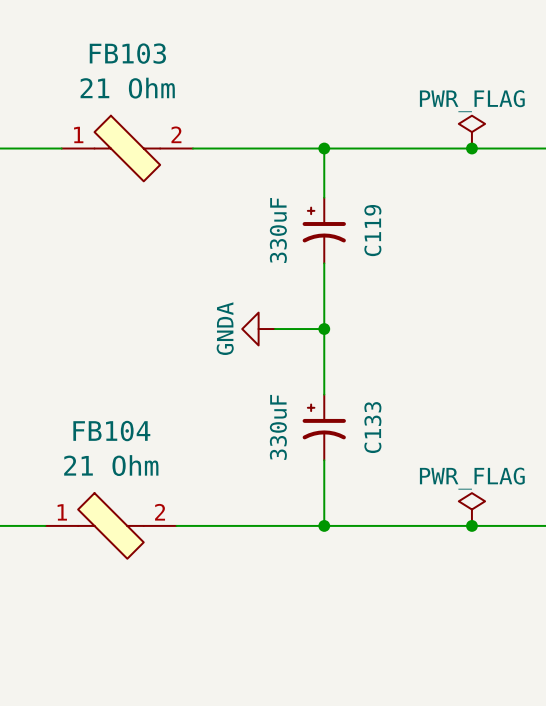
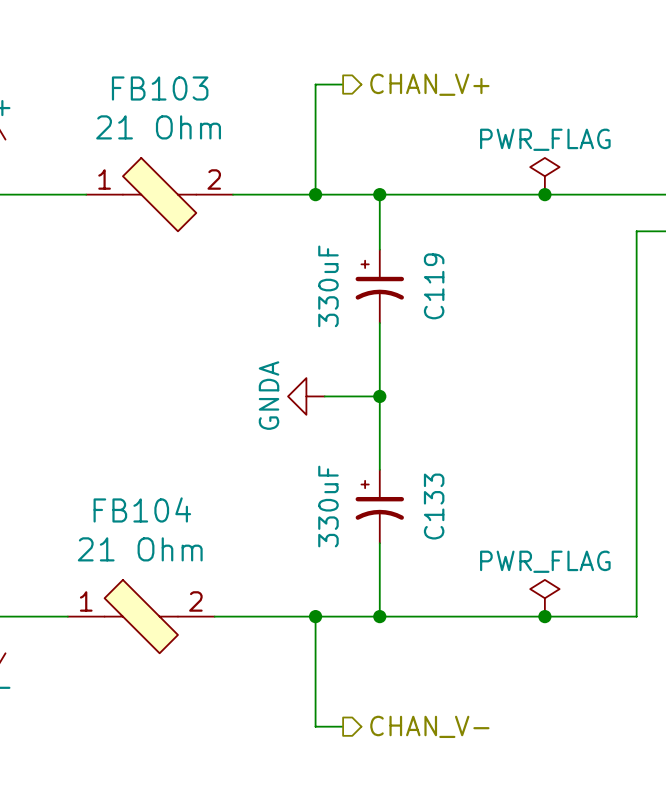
wire: none -> (343, 84) (315, 84) (315, 194)
hierarchical label: none -> CHAN_V+ (429, 84)
junction: none -> (315, 194)
wire: none -> (315, 616) (315, 726) (343, 726)
junction: none -> (315, 616)
hierarchical label: none -> CHAN_V- (429, 726)

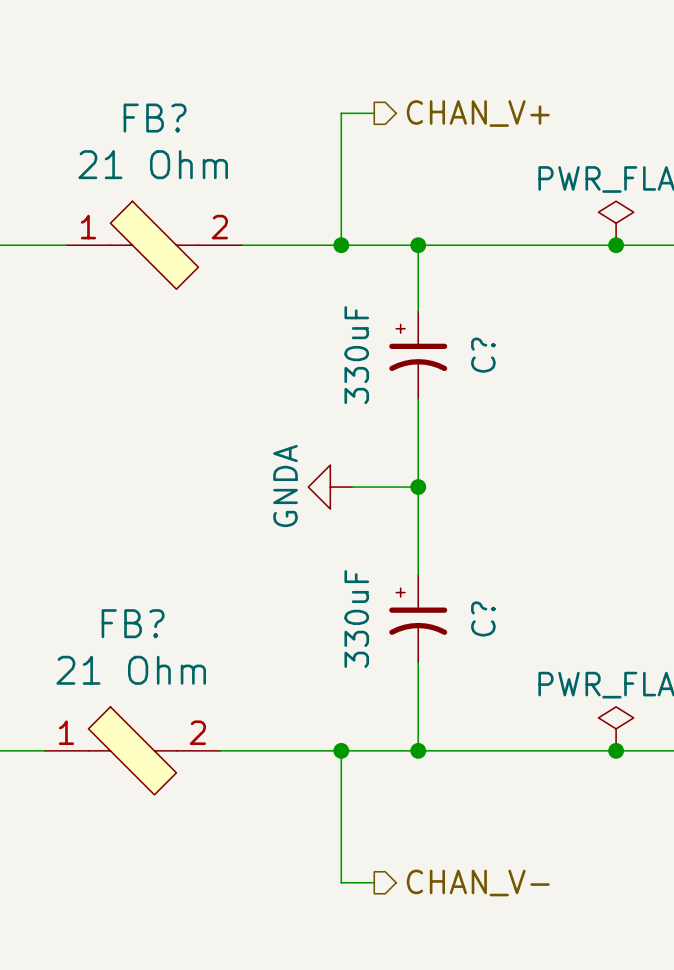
FB103 name: FB103 (160, 88) -> FB? (155, 118)
C119 name: C119 (434, 286) -> C? (483, 355)
C133 name: C133 (434, 506) -> C? (483, 618)
FB104 name: FB104 (142, 509) -> FB? (133, 623)

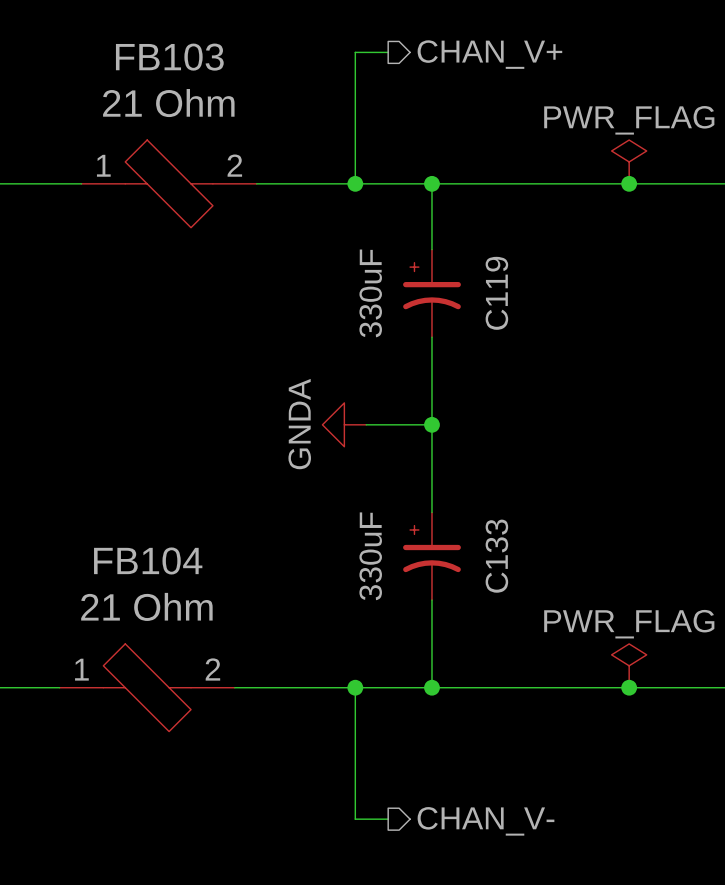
FB? name: FB? (155, 118) -> FB103 (169, 57)
C? name: C? (483, 355) -> C119 (496, 293)
C? name: C? (483, 618) -> C133 (496, 556)
FB? name: FB? (133, 623) -> FB104 (148, 560)

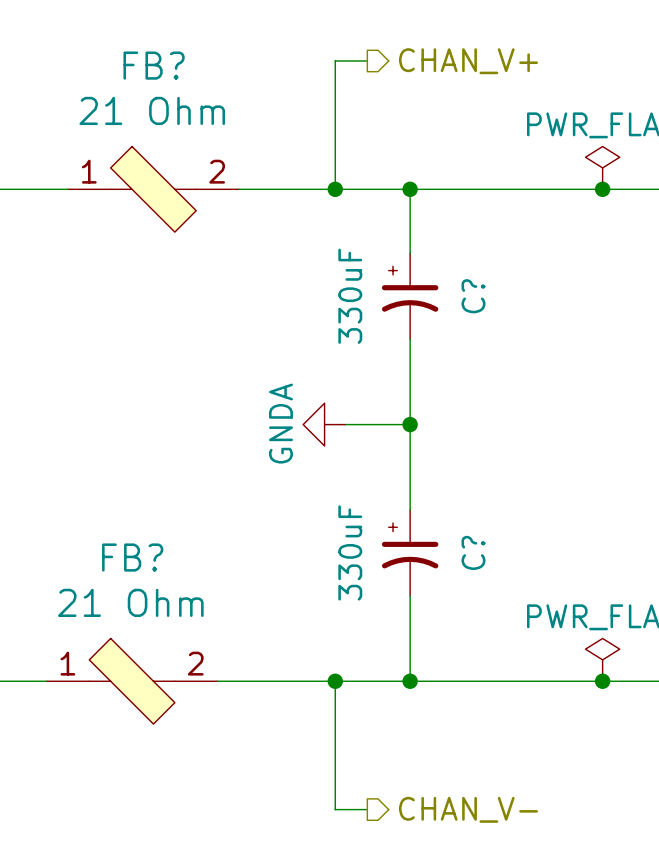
FB103 name: FB103 (169, 57) -> FB? (154, 65)
C119 name: C119 (496, 293) -> C? (473, 296)
C133 name: C133 (496, 556) -> C? (473, 552)
FB104 name: FB104 (148, 560) -> FB? (132, 557)

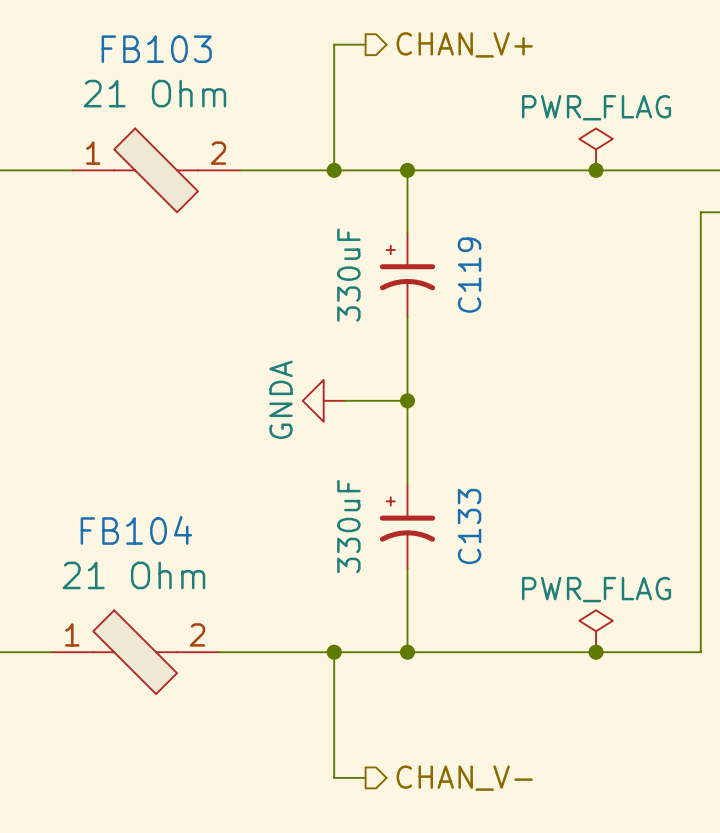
FB? name: FB? (154, 65) -> FB103 (156, 49)
C? name: C? (473, 296) -> C119 (469, 275)
C? name: C? (473, 552) -> C133 (469, 526)
FB? name: FB? (132, 557) -> FB104 (136, 530)

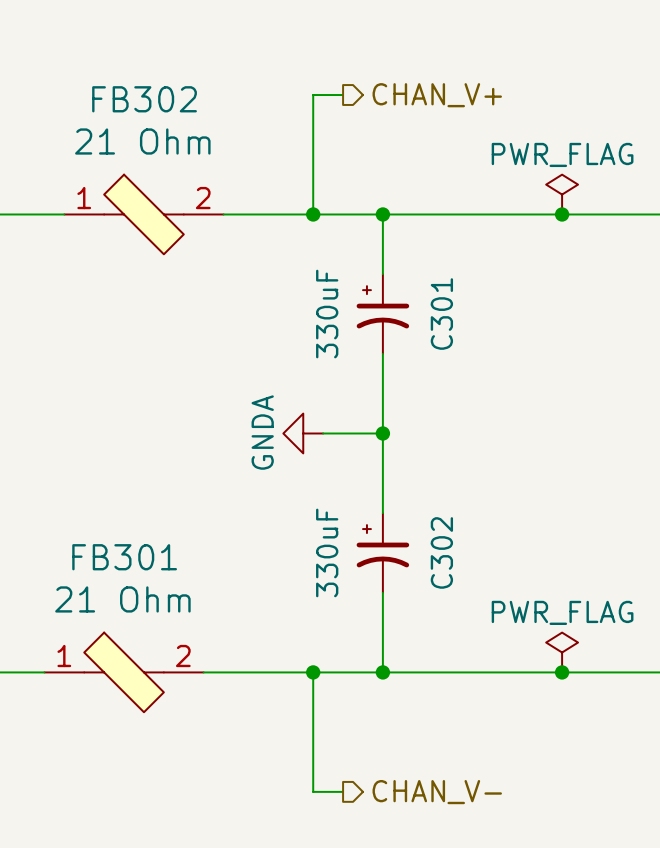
FB103 name: FB103 (156, 49) -> FB302 (144, 99)
C119 name: C119 (469, 275) -> C301 (441, 314)
C133 name: C133 (469, 526) -> C302 (441, 552)
FB104 name: FB104 (136, 530) -> FB301 (124, 557)

